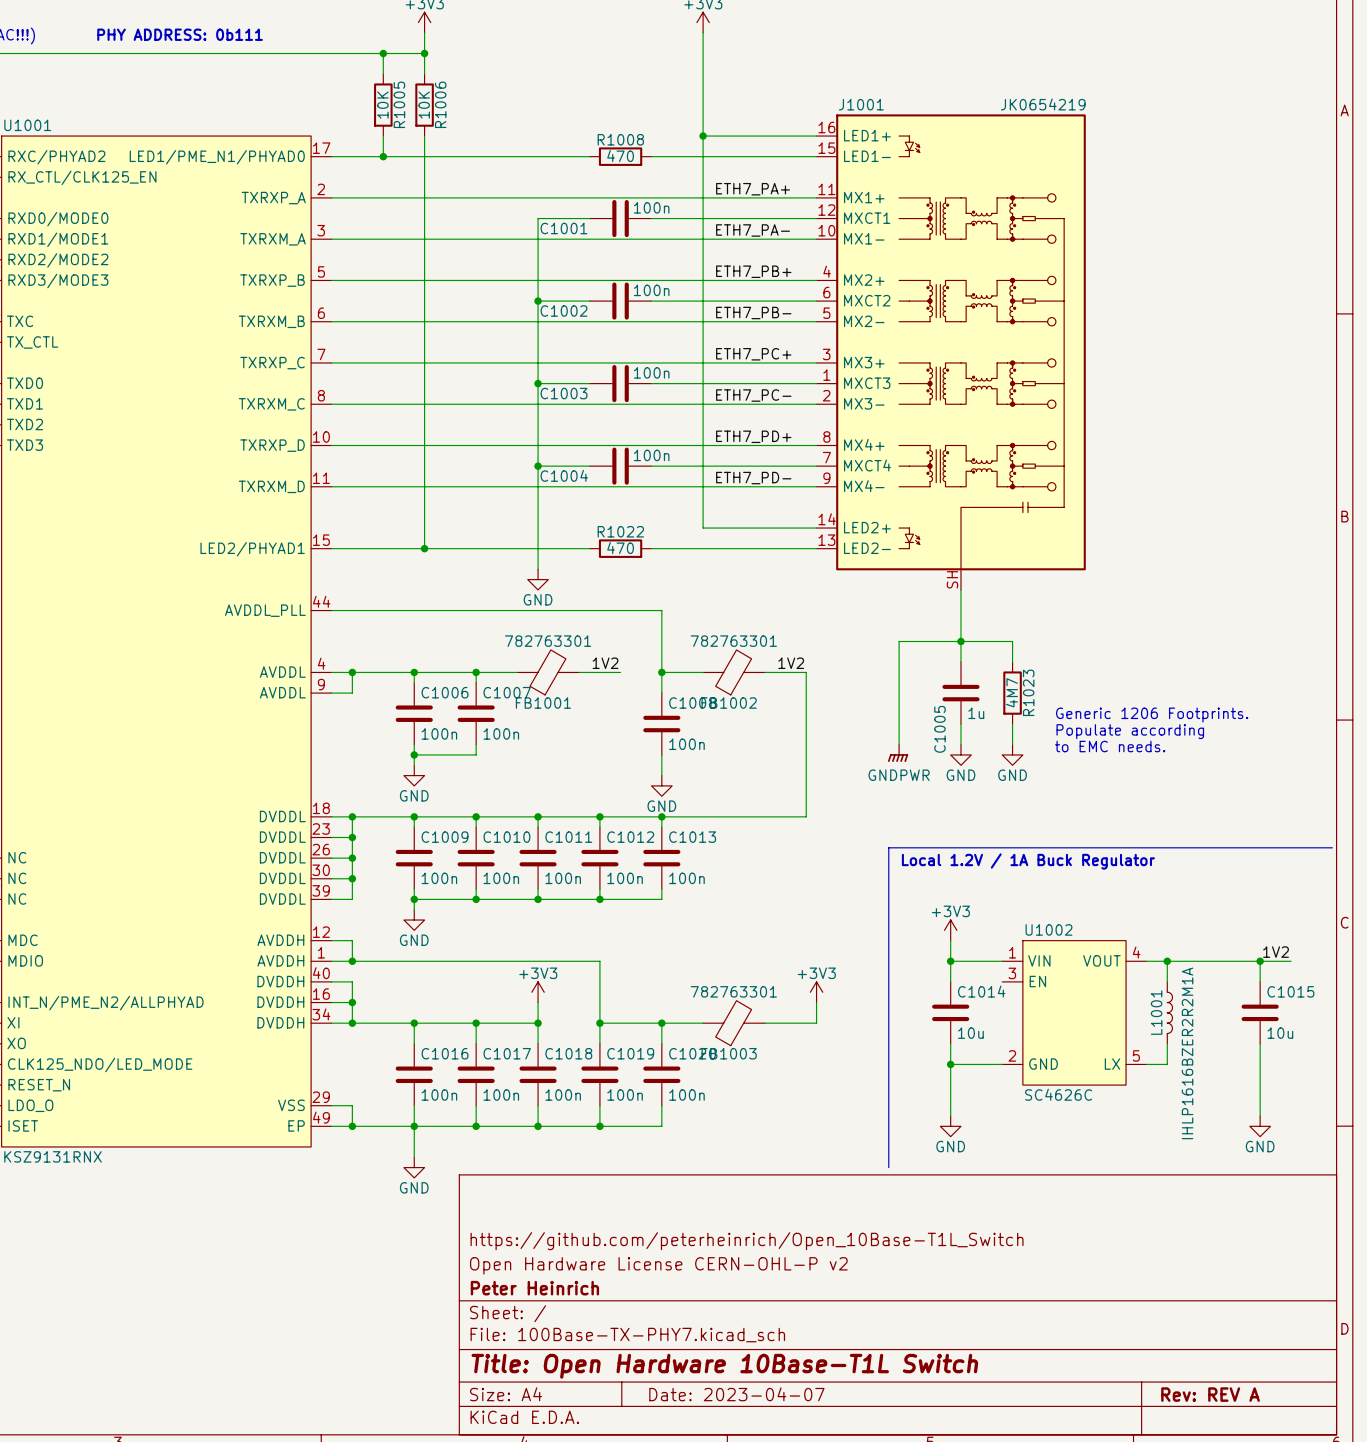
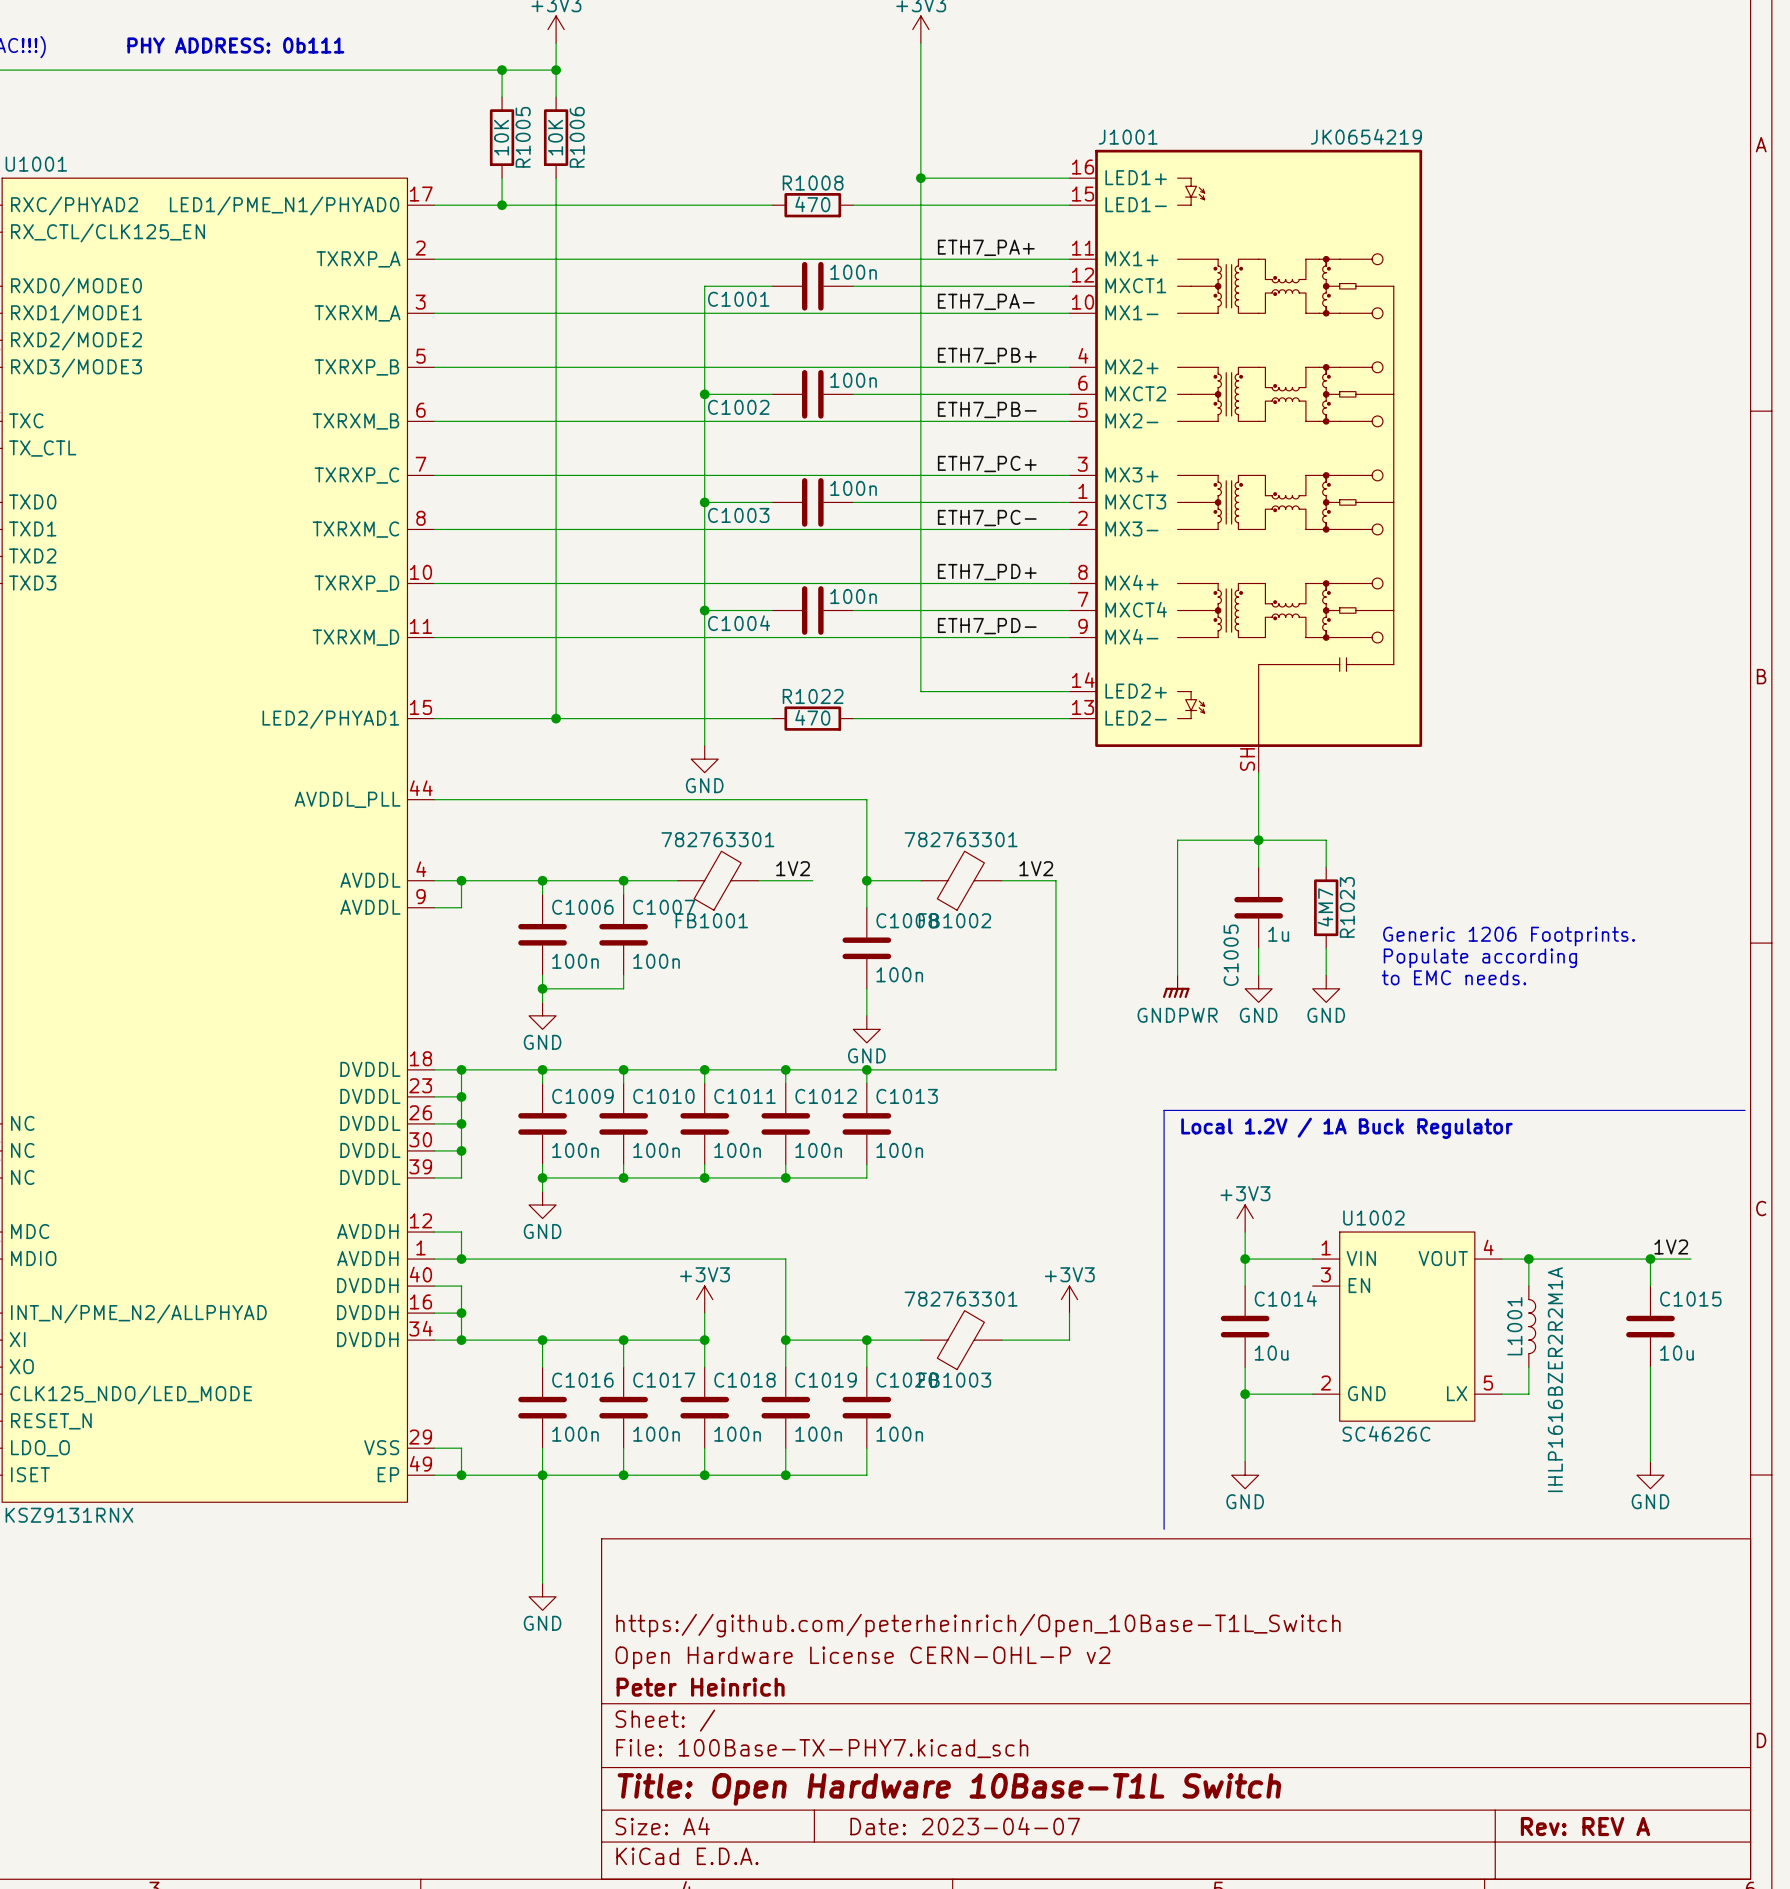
wire: none -> (542, 1515) (542, 1583)
power symbol position: GND (414, 1167) -> GND (542, 1596)

